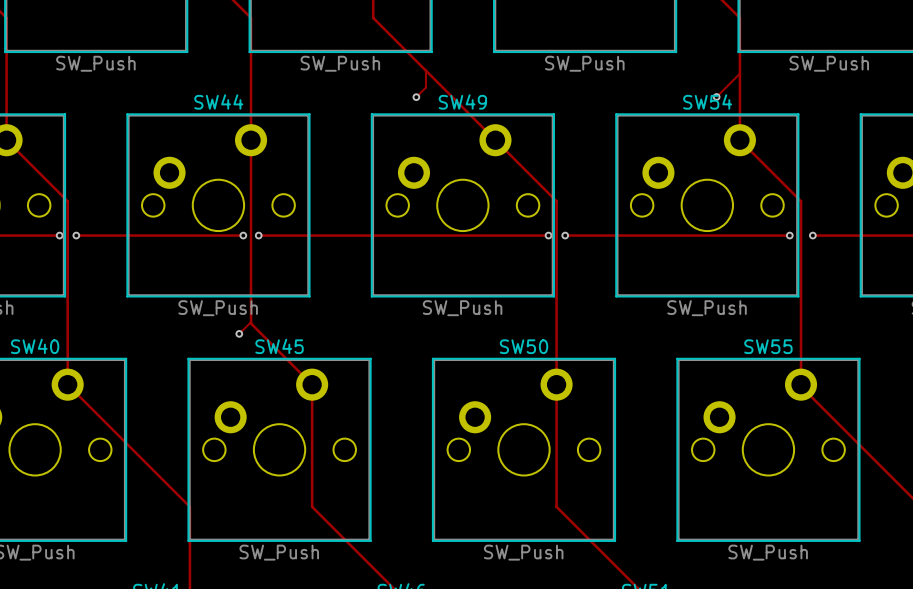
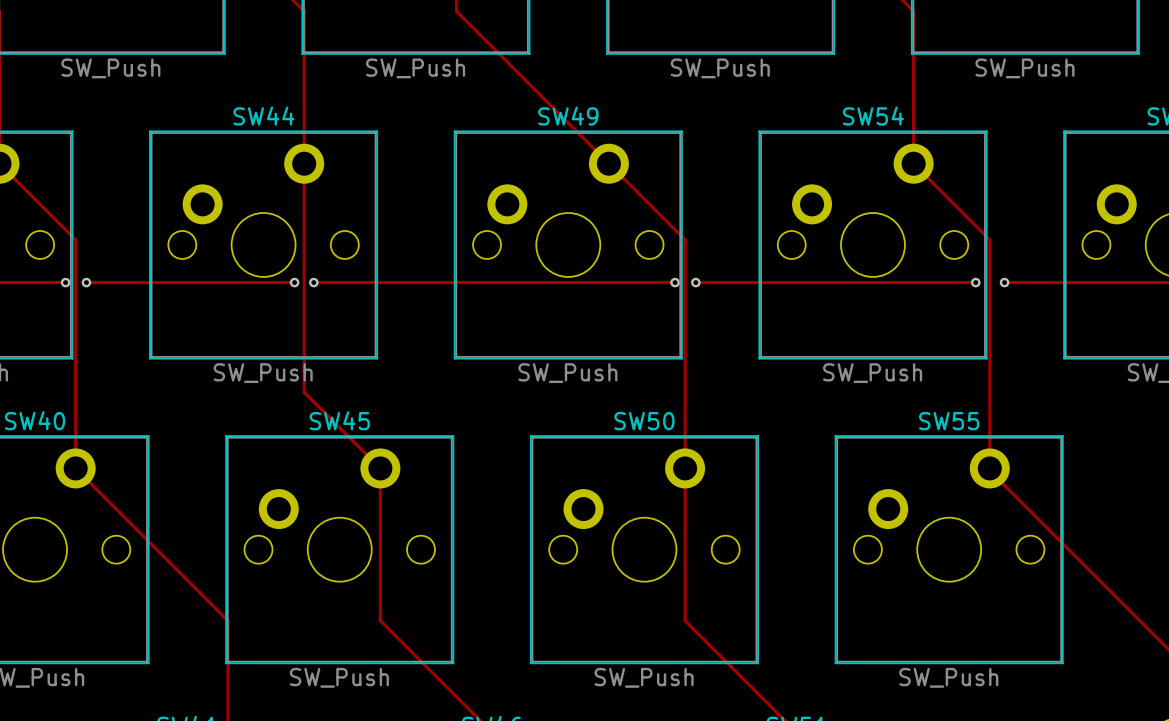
track: (425, 70) (425, 87) (416, 97) -> none
track: (739, 73) (716, 96) -> none
via: (716, 96) -> none
via: (416, 97) -> none
track: (251, 322) (239, 333) -> none
via: (239, 333) -> none

